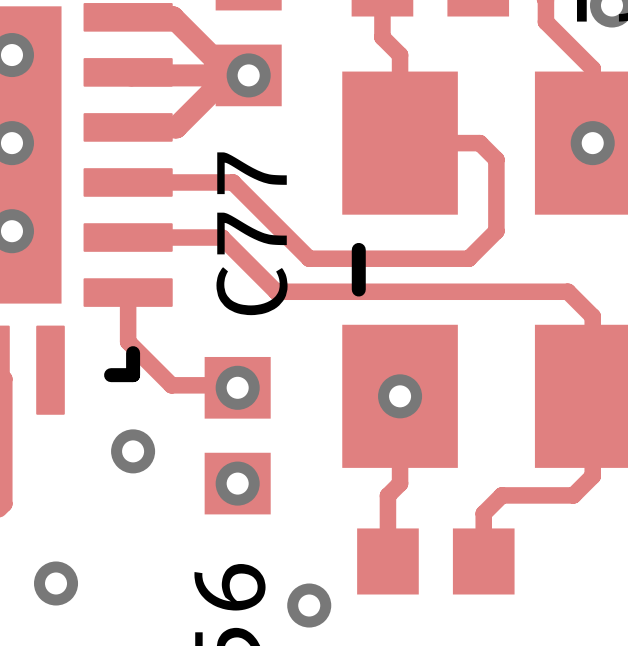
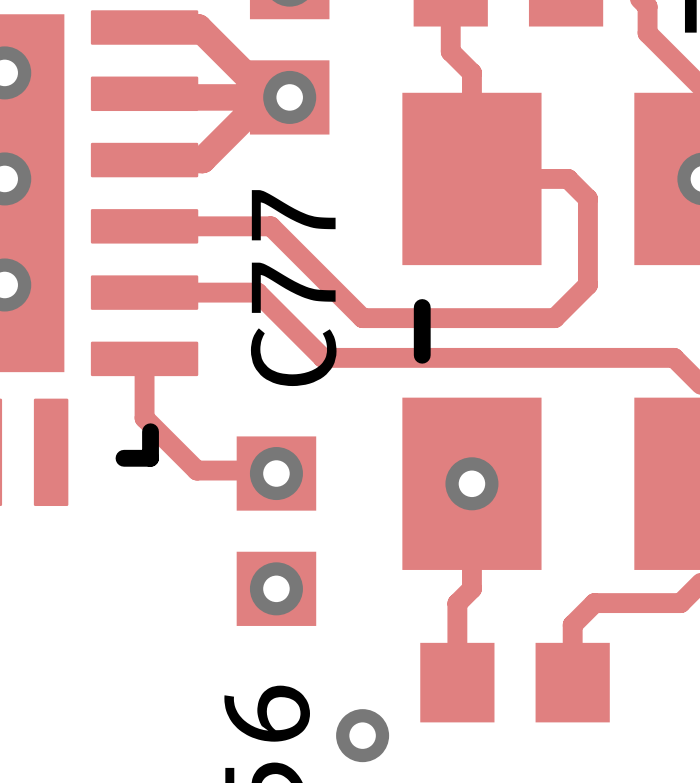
via: (133, 451) -> none
via: (56, 583) -> none

